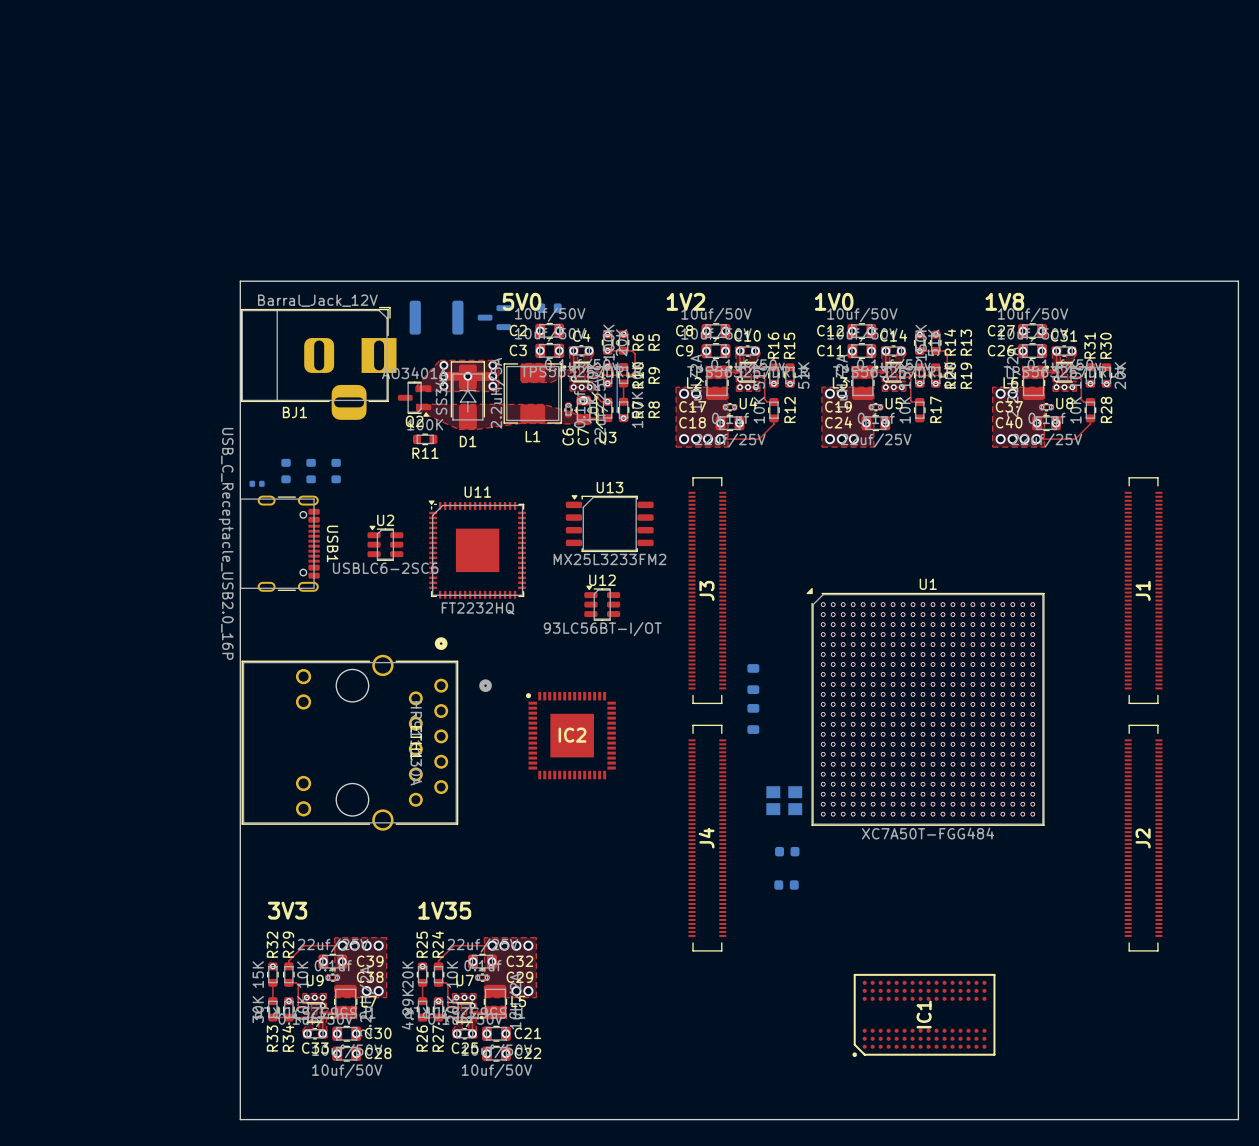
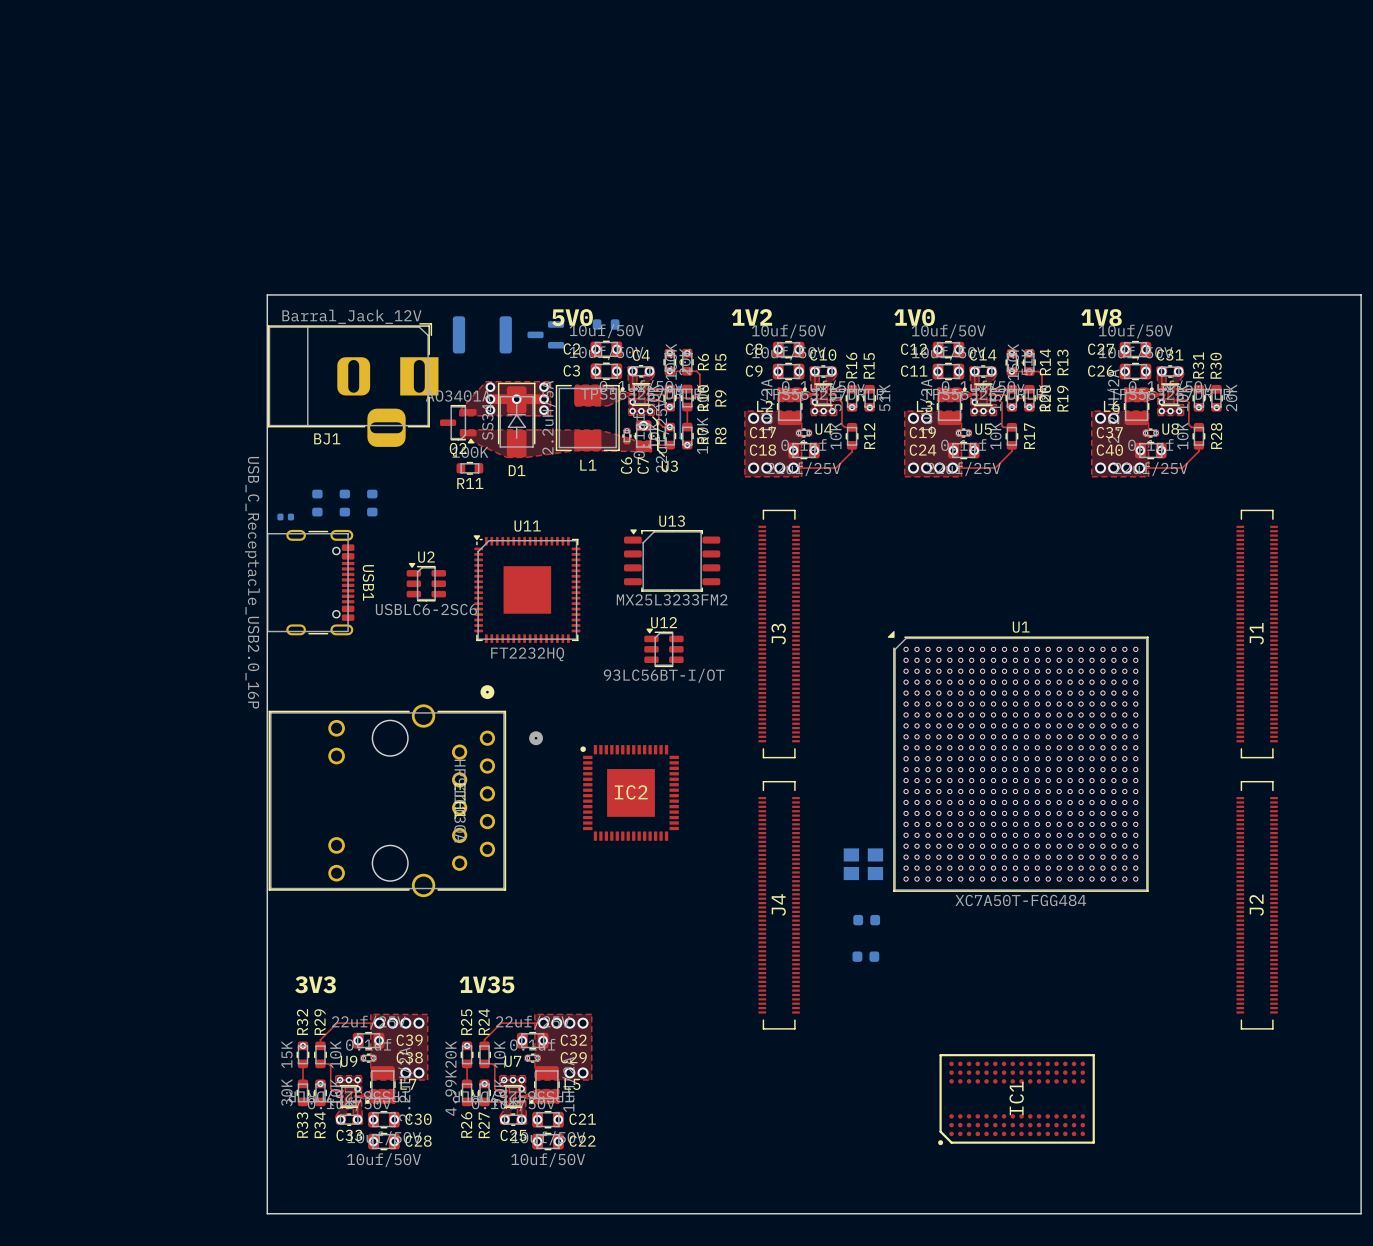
top track: none -> (1011, 445) (1011, 451) (995, 468) (952, 468)
via: none -> (952, 468)
part: (753, 679) -> none
part: (753, 718) -> none

